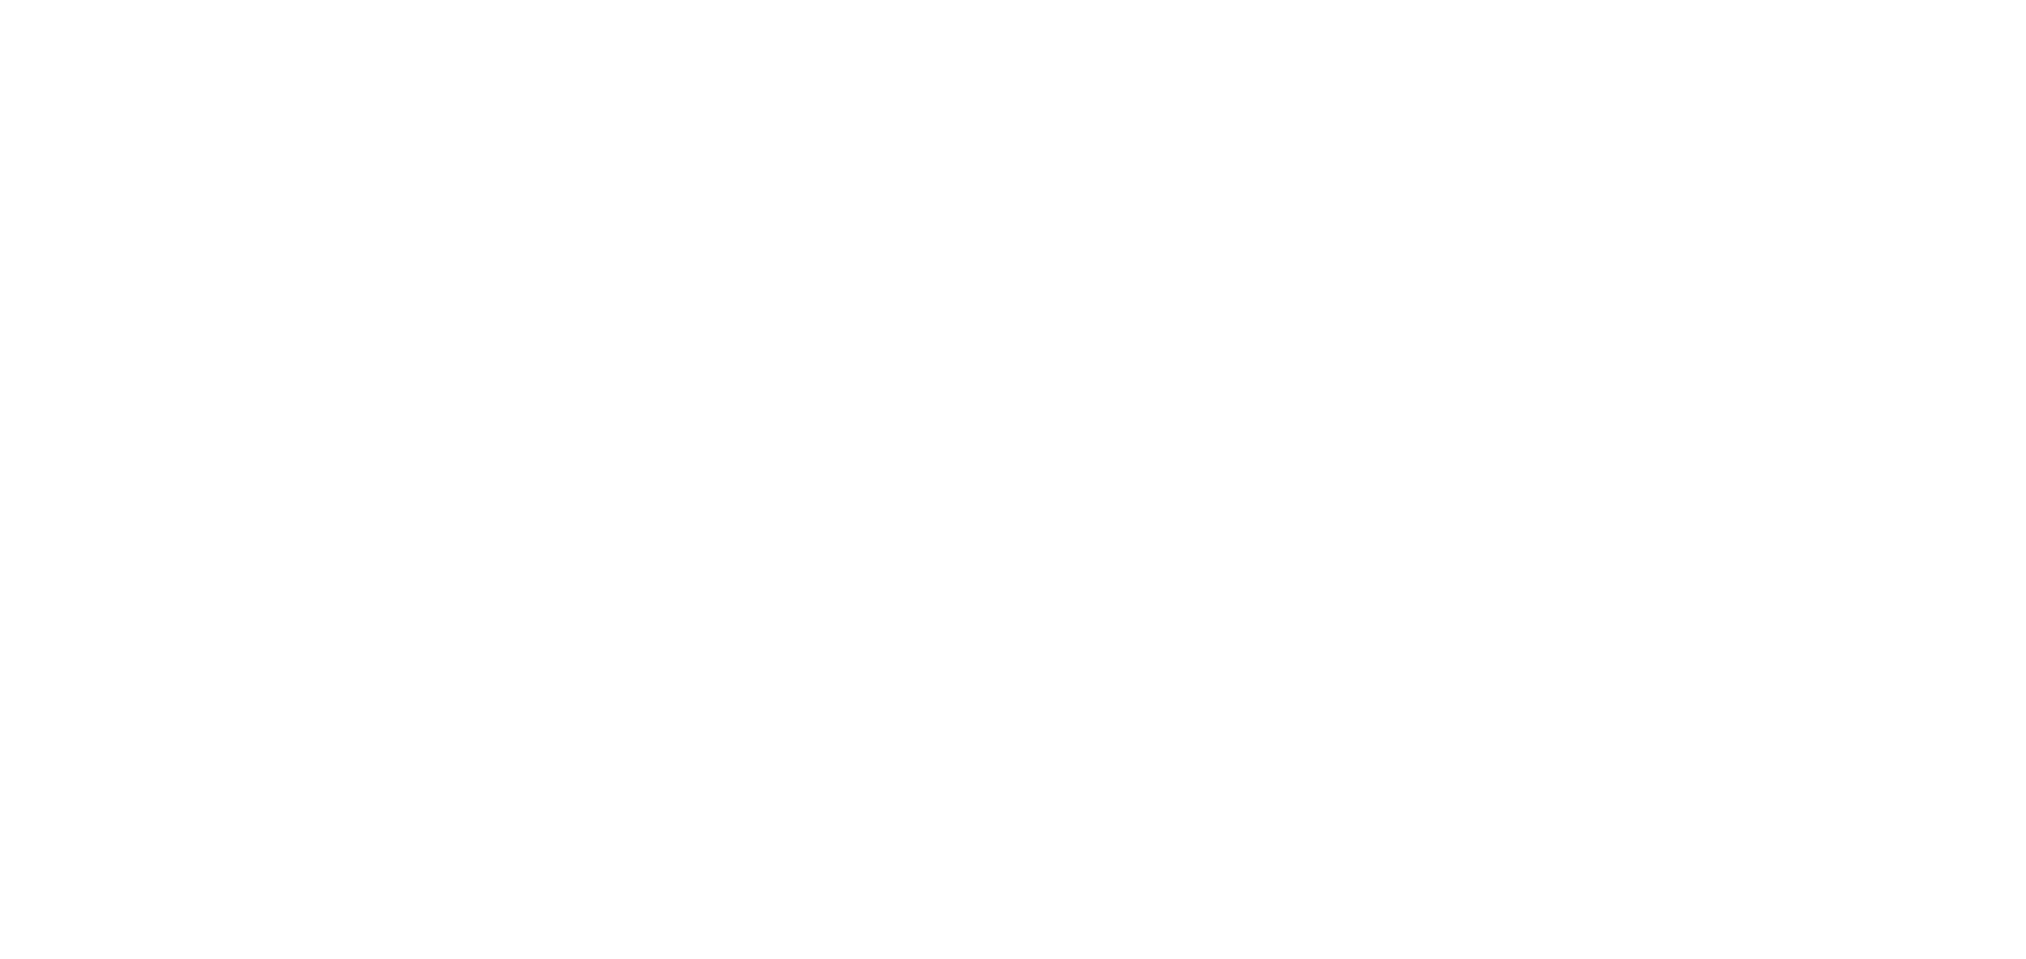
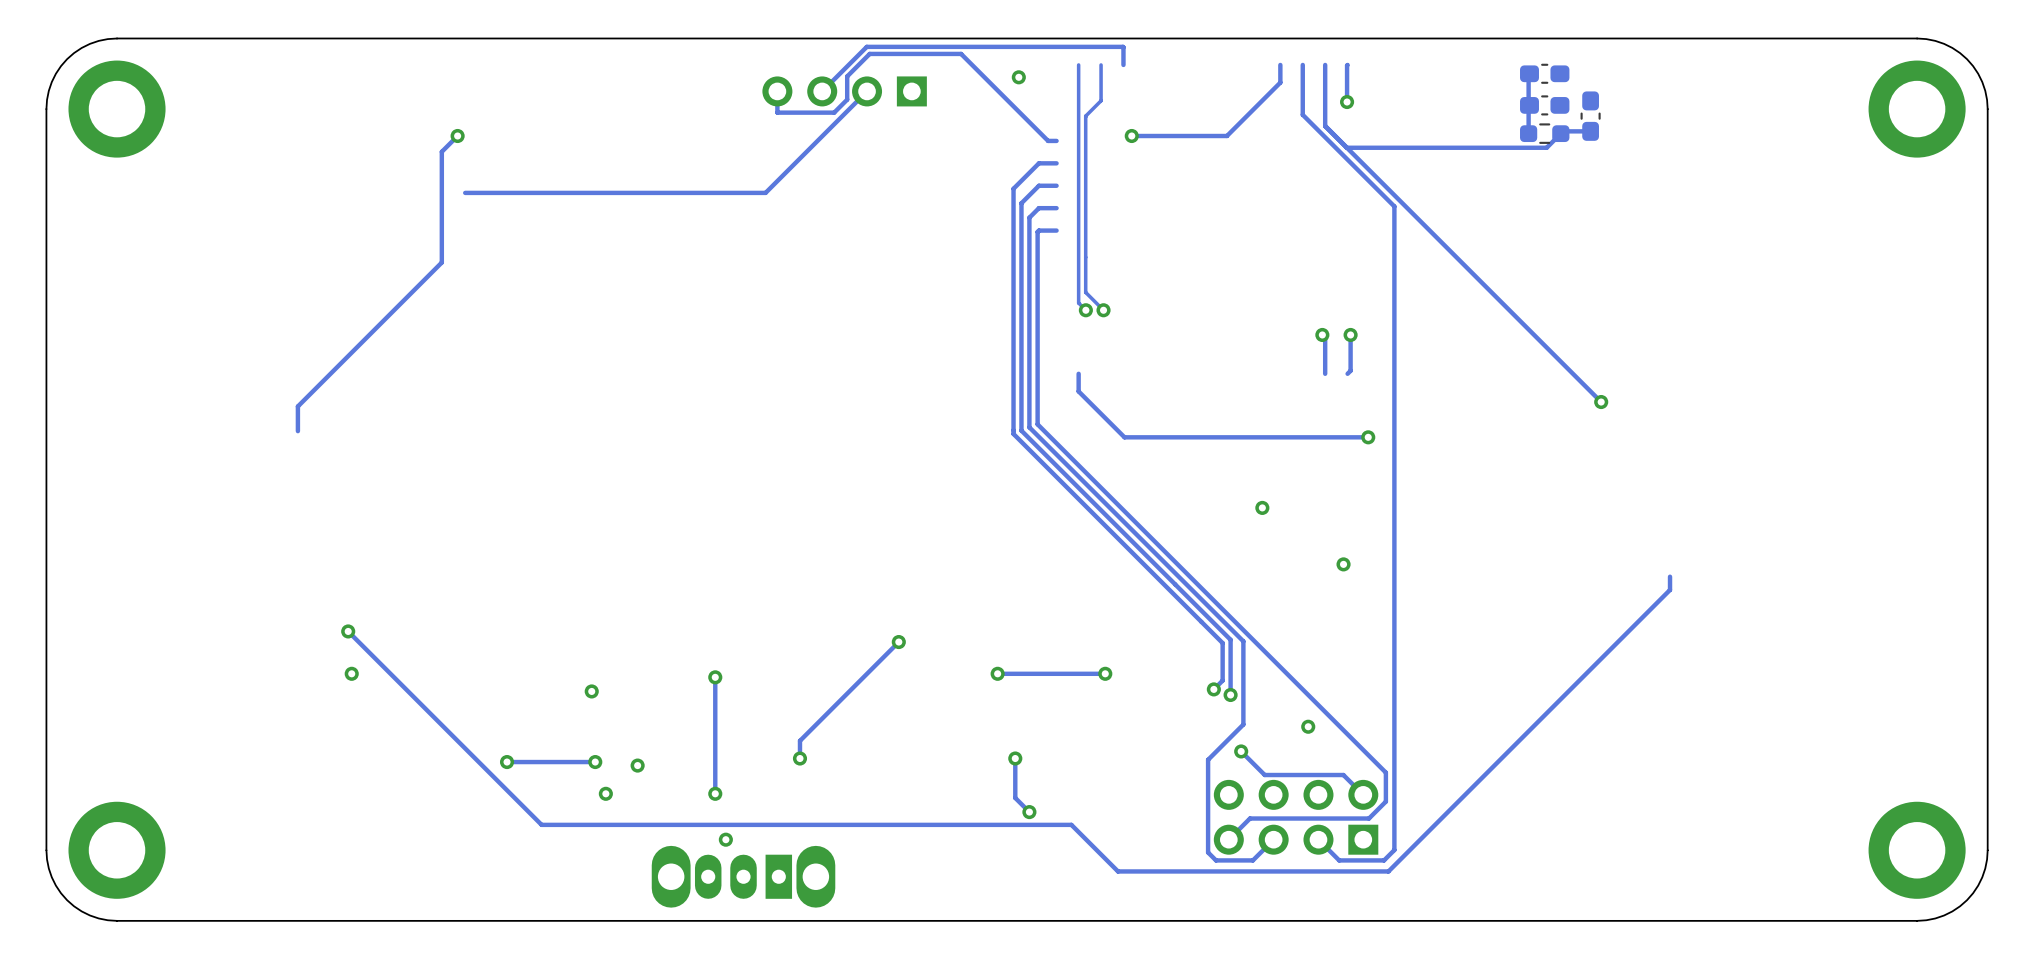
board edge: none -> (1917, 38) (117, 38) (90, 43) (67, 59) (55, 73) (48, 90) (46, 109) (46, 850) (51, 877) (67, 900) (81, 911) (98, 918) (117, 920) (1917, 920) (1944, 915) (1960, 906) (1973, 893) (1982, 877) (1987, 850) (1987, 109) (1982, 82) (1967, 59) (1944, 43) (1917, 38)
track: none -> (1078, 64) (1078, 303) (1085, 310)
track: none -> (1101, 64) (1101, 100) (1085, 116)
track: none -> (1123, 64) (1123, 46) (866, 46) (822, 91)
track: none -> (1280, 64) (1280, 82) (1226, 136) (1131, 136)
track: none -> (1302, 64) (1302, 114) (1394, 206) (1394, 850) (1384, 860) (1339, 860) (1318, 839)
track: none -> (1325, 64) (1325, 126) (1601, 402)
track: none -> (1347, 64) (1347, 102)
track: none -> (1529, 73) (1528, 133)
part: none -> (1544, 73)
via: none -> (1018, 77)
track: none -> (777, 91) (777, 112) (834, 112) (847, 99) (847, 76) (869, 53) (961, 53) (1048, 140) (1056, 140)
part: none -> (844, 91)
track: none -> (867, 91) (765, 192) (465, 192)
via: none -> (1347, 102)
part: none -> (1544, 105)
part: none -> (117, 109)
part: none -> (1917, 109)
track: none -> (1085, 116) (1085, 292) (1103, 310)
part: none -> (1590, 116)
track: none -> (1590, 131) (1563, 131) (1546, 147) (1346, 147)
part: none -> (1544, 133)
track: none -> (457, 136) (441, 151) (441, 262) (297, 406) (297, 431)
via: none -> (457, 136)
via: none -> (1131, 136)
track: none -> (1056, 163) (1038, 163) (1013, 188) (1013, 433) (1222, 643) (1222, 680) (1213, 689)
track: none -> (1056, 185) (1038, 185) (1021, 203) (1021, 430) (1230, 639) (1230, 694)
track: none -> (1056, 208) (1038, 208) (1029, 217) (1029, 427) (1243, 641) (1243, 724) (1208, 759) (1208, 852) (1216, 860) (1252, 860) (1273, 839)
track: none -> (1056, 230) (1037, 231) (1037, 424) (1385, 772) (1385, 801) (1368, 818) (1250, 818) (1228, 839)
via: none -> (1085, 310)
via: none -> (1103, 310)
track: none -> (1322, 334) (1325, 337) (1325, 373)
via: none -> (1322, 334)
track: none -> (1350, 334) (1350, 370) (1347, 373)
via: none -> (1350, 334)
track: none -> (1078, 373) (1078, 391) (1124, 437) (1368, 437)
via: none -> (1601, 402)
via: none -> (1368, 437)
via: none -> (1262, 507)
via: none -> (1343, 564)
track: none -> (1670, 576) (1670, 589) (1388, 871) (1118, 871) (1071, 824) (541, 824) (348, 631)
via: none -> (348, 631)
track: none -> (898, 642) (799, 740) (799, 758)
via: none -> (898, 642)
via: none -> (351, 673)
via: none -> (997, 673)
track: none -> (1105, 673) (997, 673)
via: none -> (1105, 673)
track: none -> (715, 677) (715, 793)
via: none -> (715, 677)
via: none -> (1213, 689)
via: none -> (591, 691)
via: none -> (1230, 694)
via: none -> (1308, 726)
track: none -> (1241, 751) (1264, 775) (1343, 775) (1363, 794)
via: none -> (1241, 751)
via: none -> (799, 758)
track: none -> (1015, 758) (1015, 797) (1029, 812)
via: none -> (1015, 758)
via: none -> (507, 762)
track: none -> (595, 762) (507, 762)
via: none -> (595, 762)
via: none -> (637, 765)
via: none -> (605, 793)
via: none -> (715, 793)
via: none -> (1029, 812)
part: none -> (1296, 817)
via: none -> (725, 839)
part: none -> (117, 850)
part: none -> (1917, 850)
part: none -> (743, 876)

